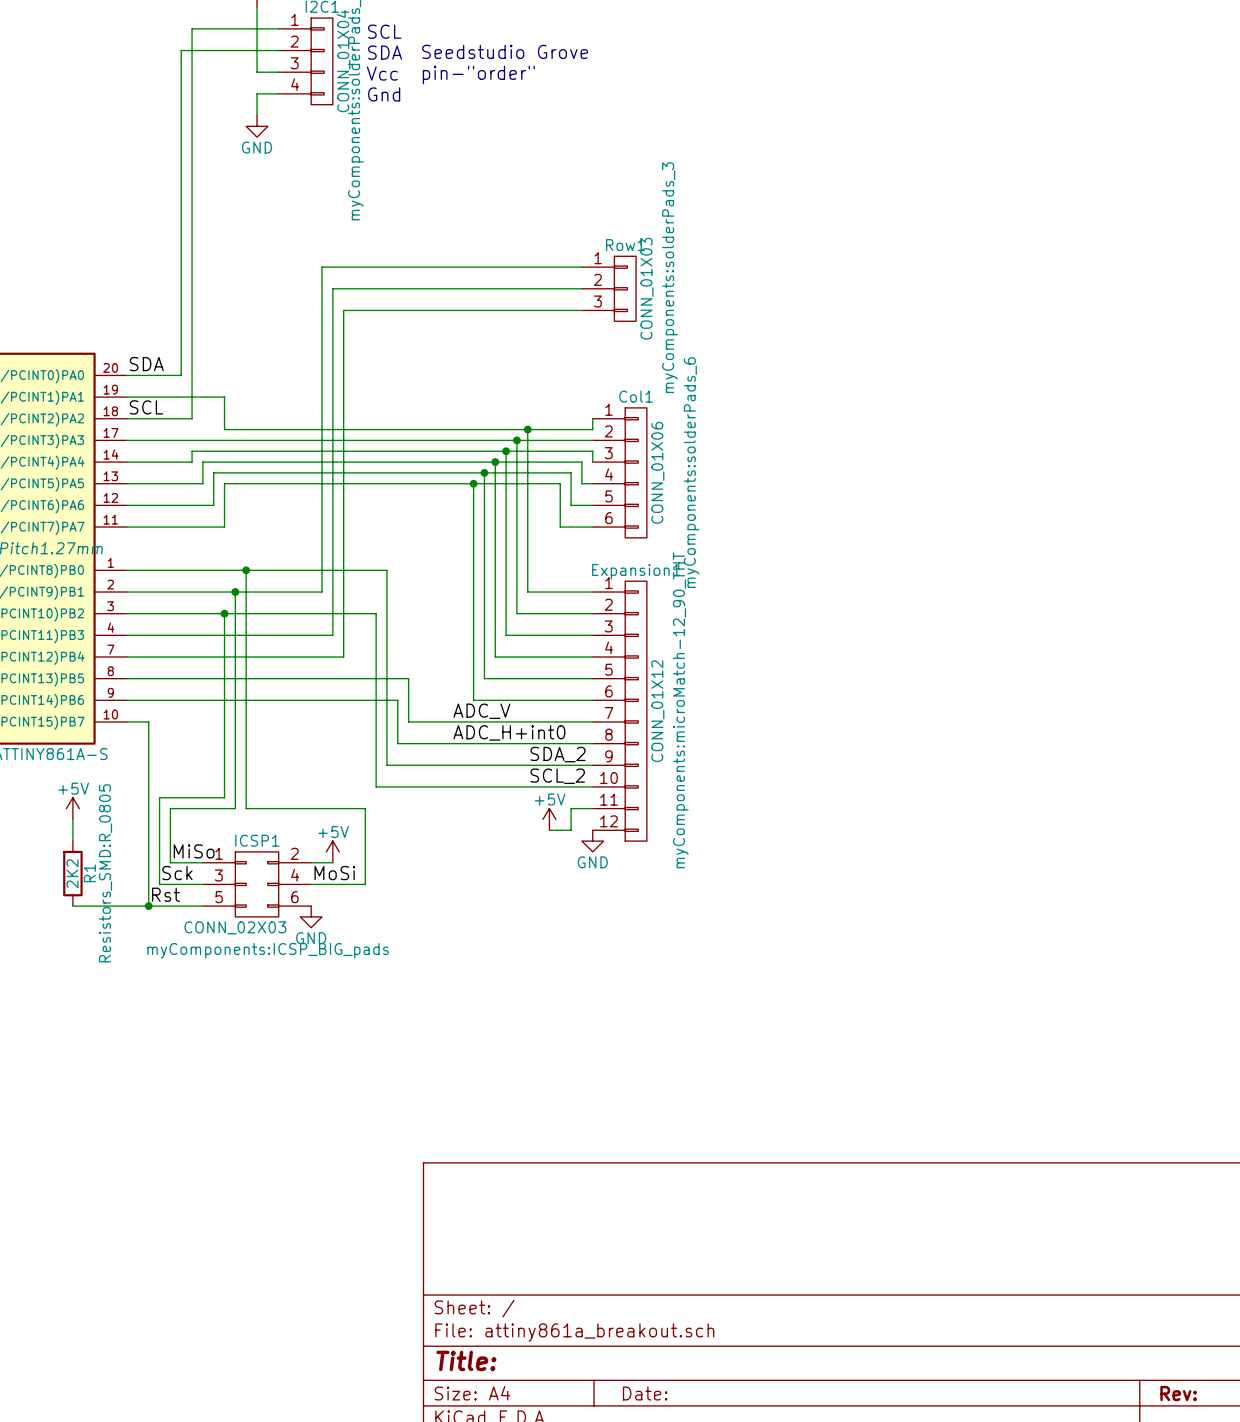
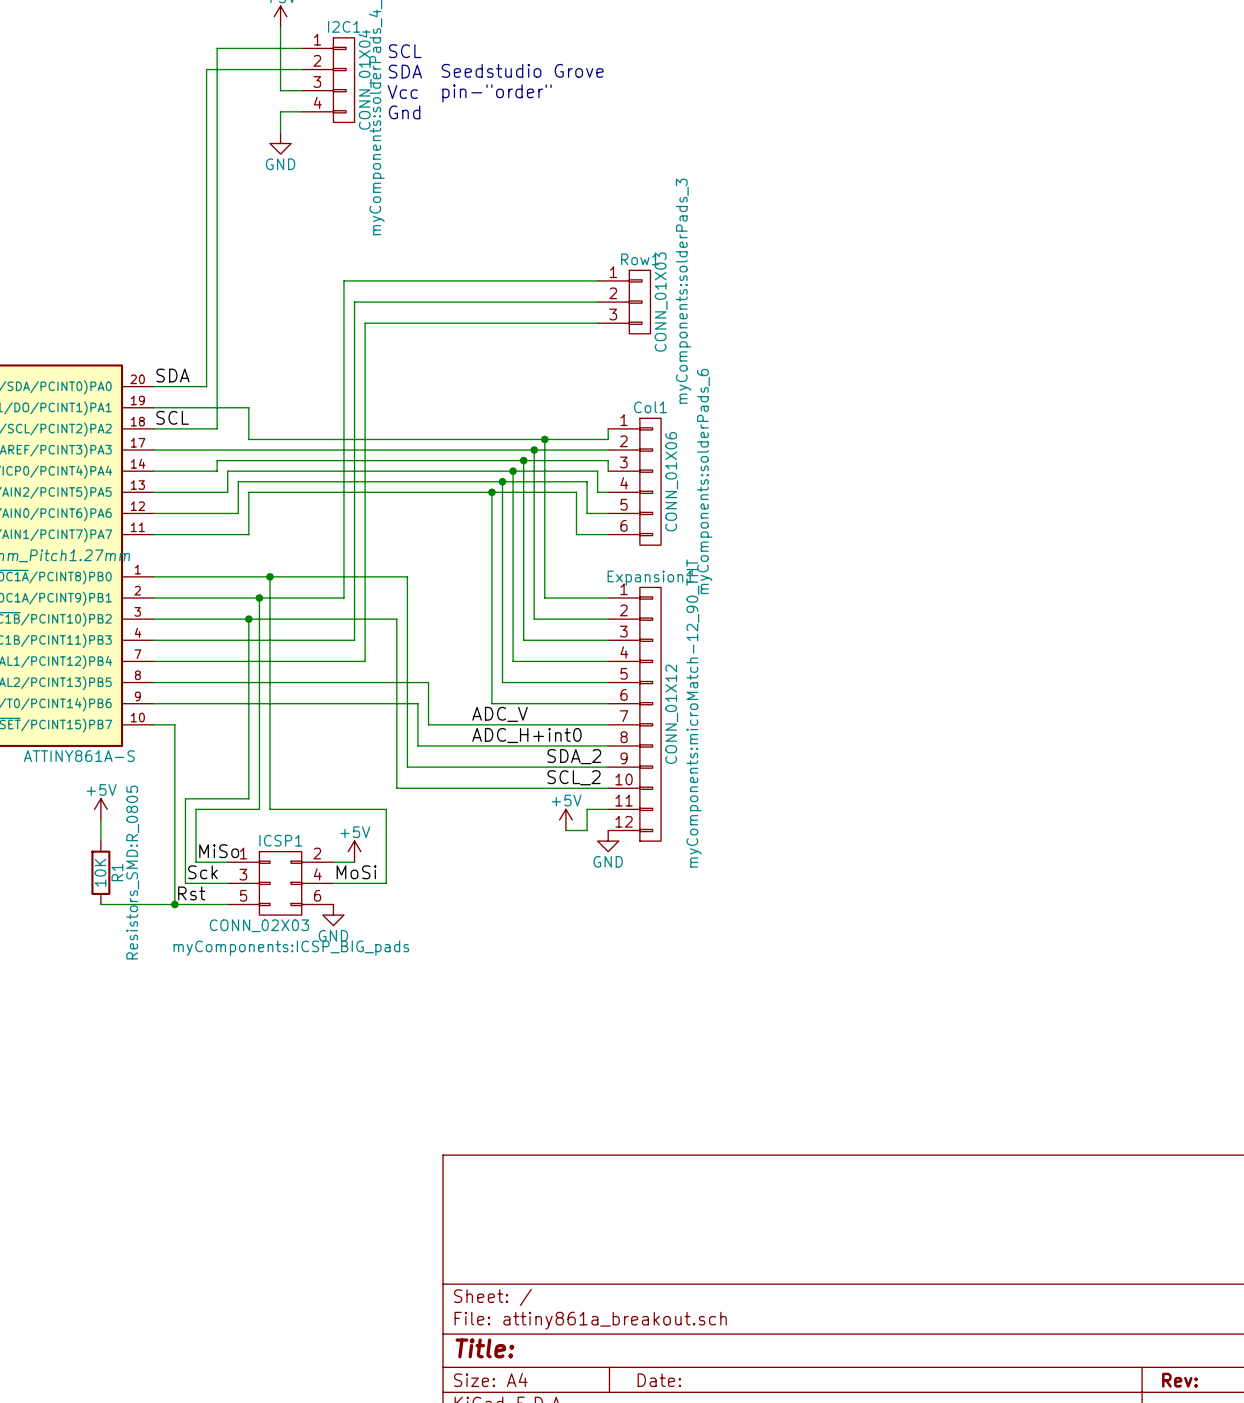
R1 value: 2K2 (72, 873) -> 10K (100, 872)

